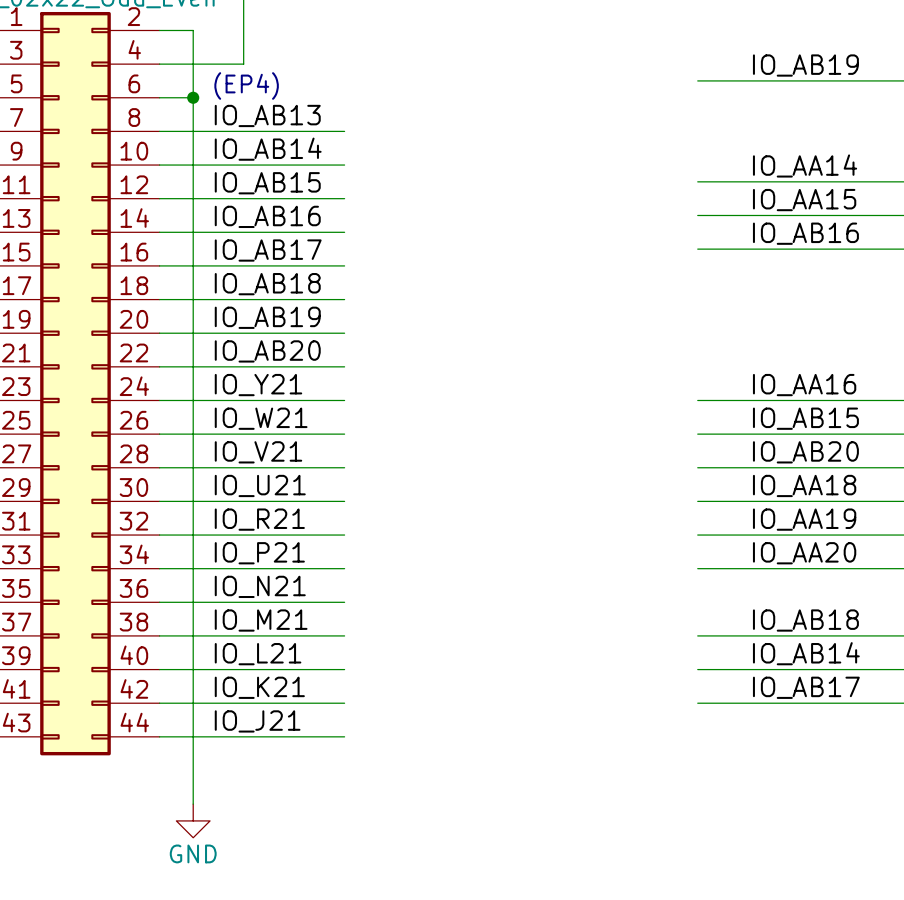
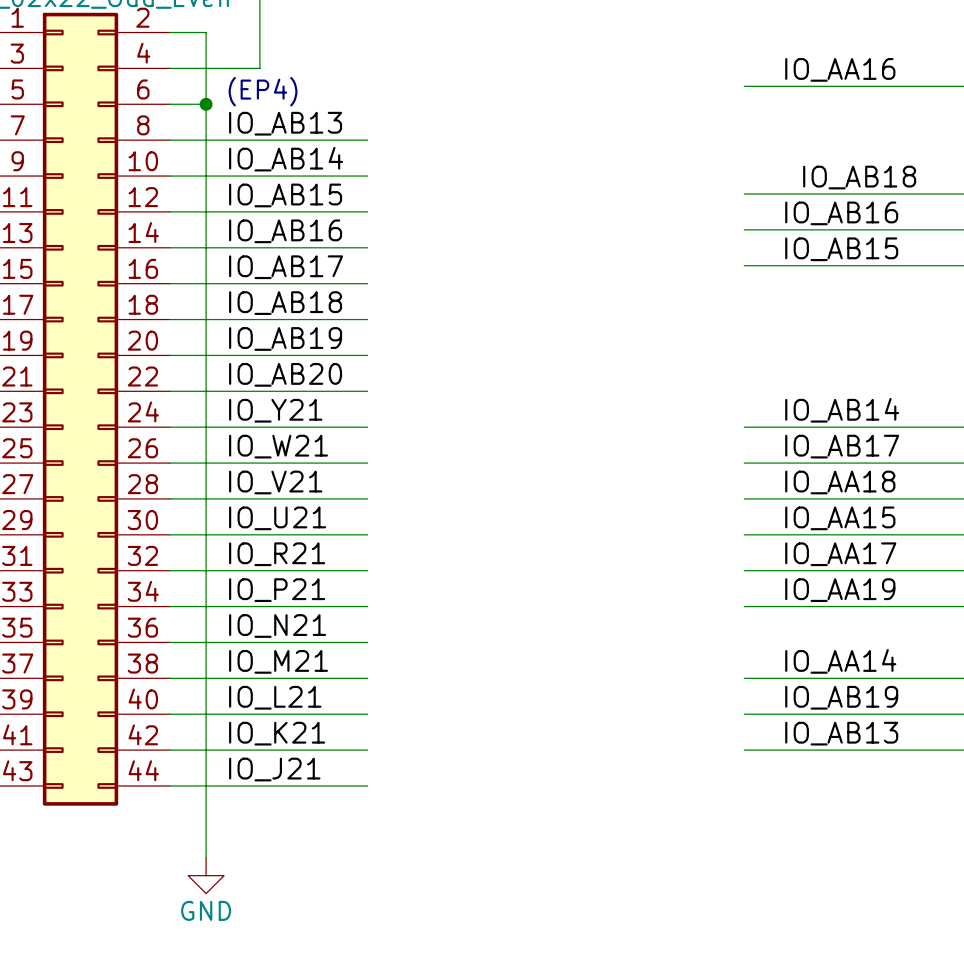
label: IO_AB19 (805, 65) -> none
label: IO_AA14 (805, 165) -> IO_AB18 (859, 177)
label position: IO_AA15 (804, 200) -> IO_AA15 (840, 518)
label position: IO_AB16 (805, 233) -> IO_AB16 (841, 213)
label position: IO_AA16 (804, 385) -> IO_AA16 (840, 69)
label position: IO_AB15 (805, 418) -> IO_AB15 (841, 249)
label: IO_AB20 (805, 452) -> none
label position: IO_AA18 (804, 485) -> IO_AA18 (840, 482)
label position: IO_AA19 (804, 519) -> IO_AA19 (840, 590)
label: IO_AA20 (804, 553) -> IO_AA17 (840, 554)
label: IO_AB18 (805, 620) -> IO_AA14 (840, 661)
label position: IO_AB14 (806, 653) -> IO_AB14 (842, 410)
label: none -> IO_AB19 (841, 697)
label: none -> IO_AB13 (841, 733)
label position: IO_AB17 (806, 687) -> IO_AB17 (842, 446)

